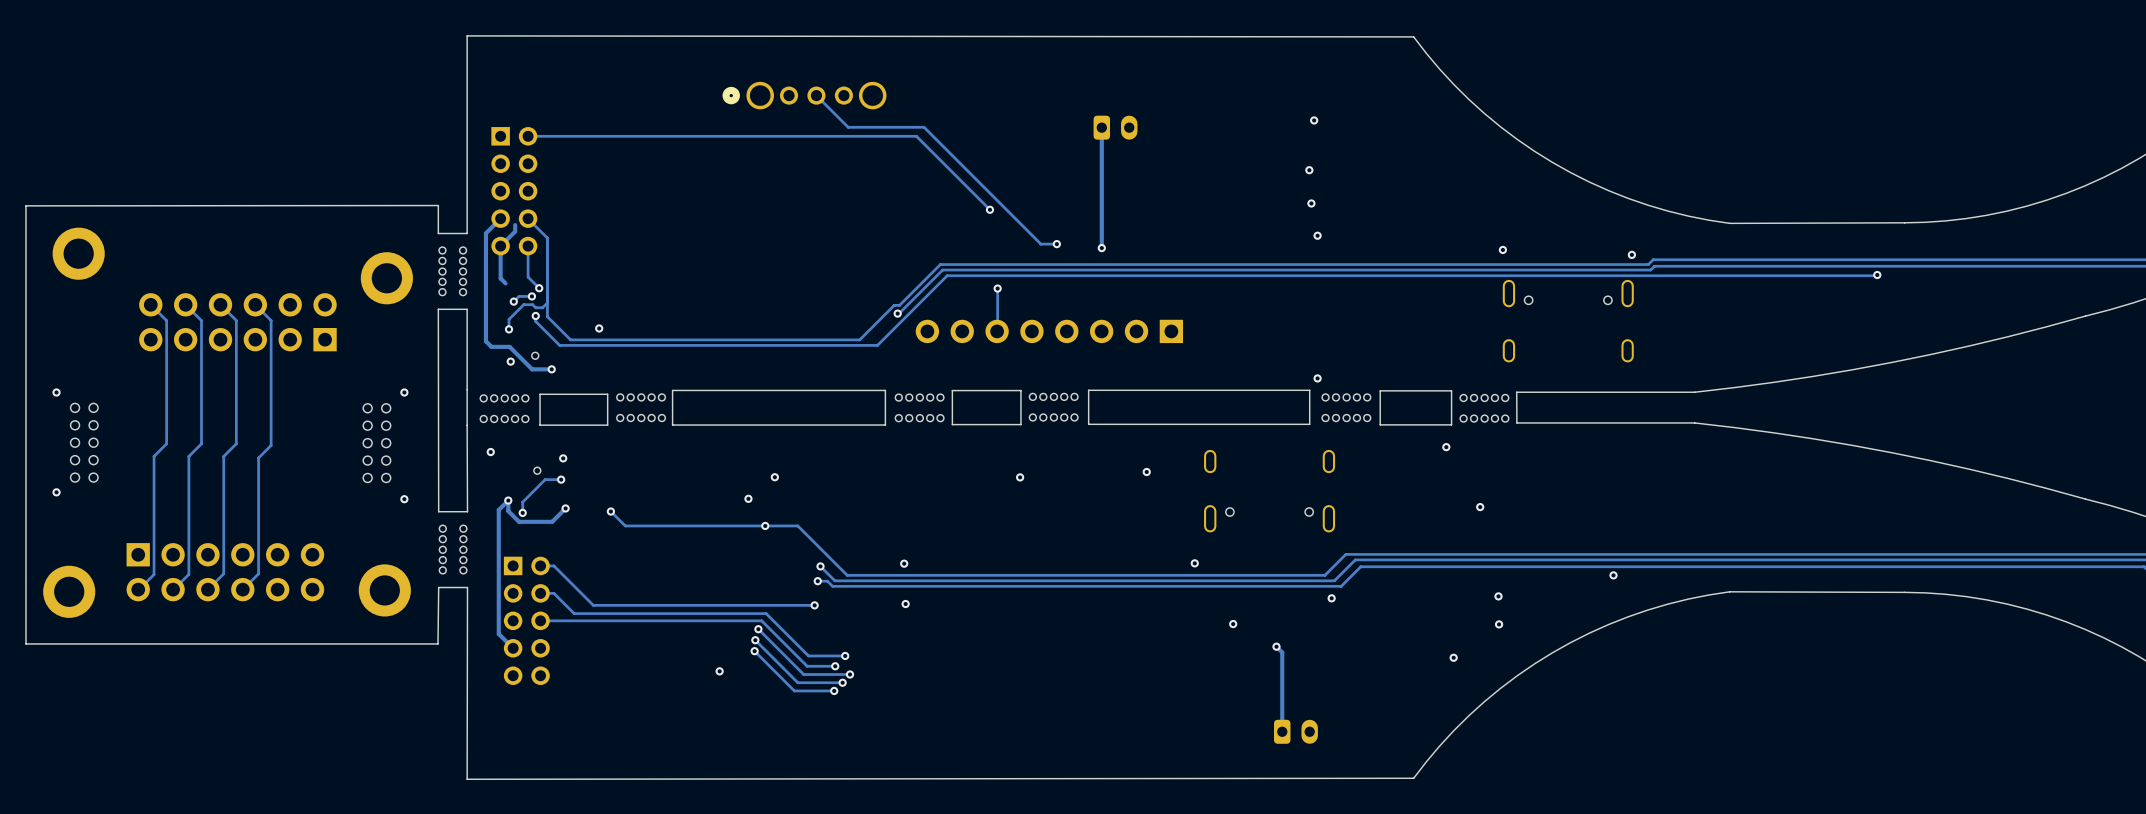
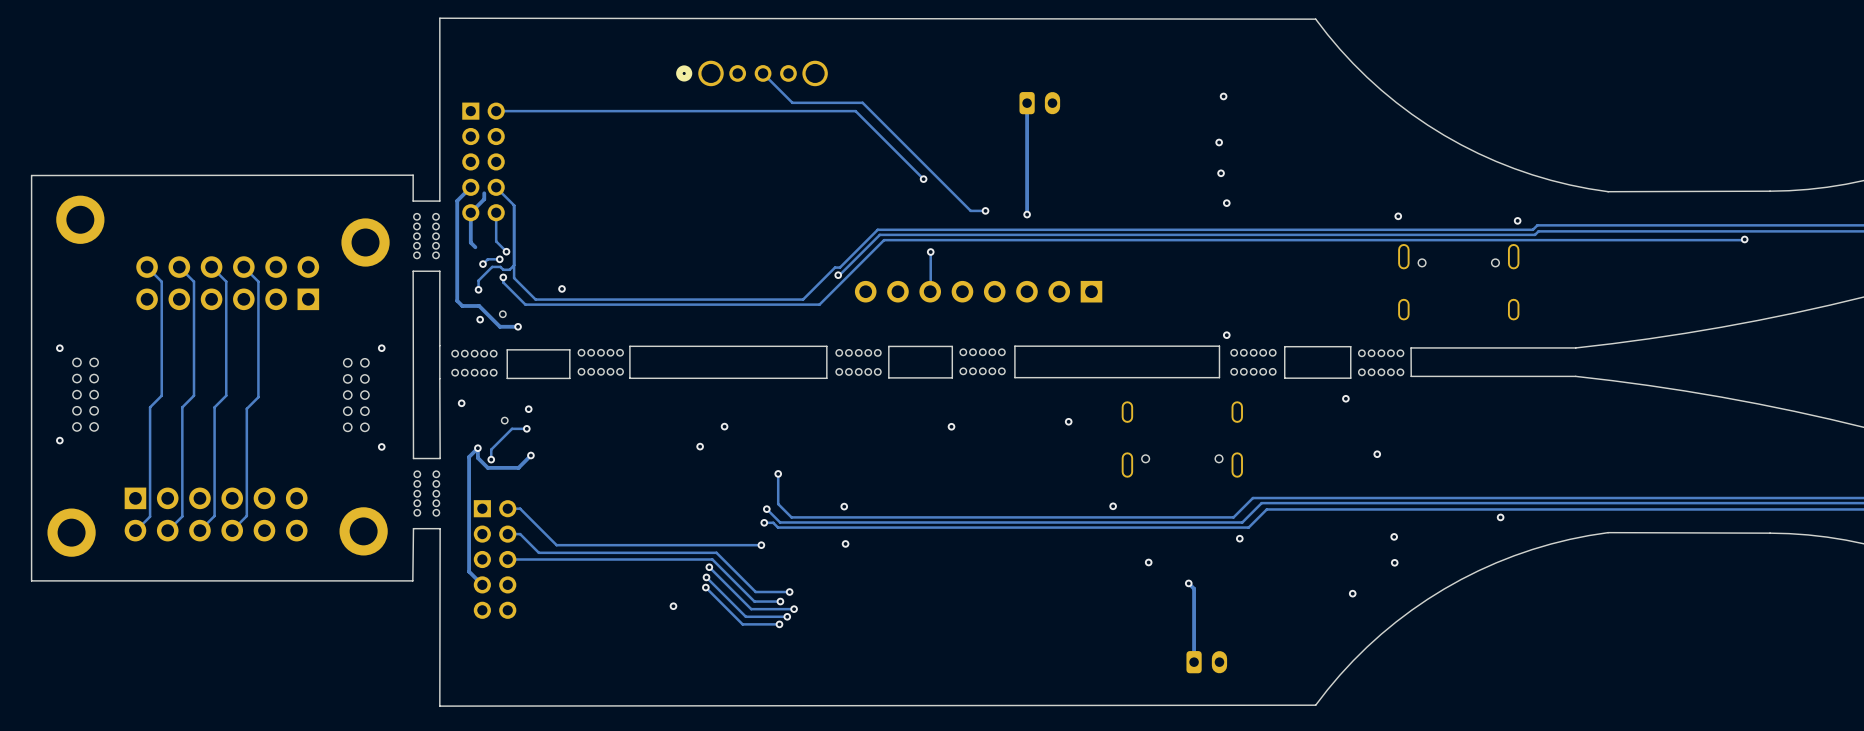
track: (610, 511) (625, 525) (797, 525) (832, 560) -> (778, 473) (778, 504)
via: (610, 511) -> none
via position: (765, 525) -> (778, 473)

